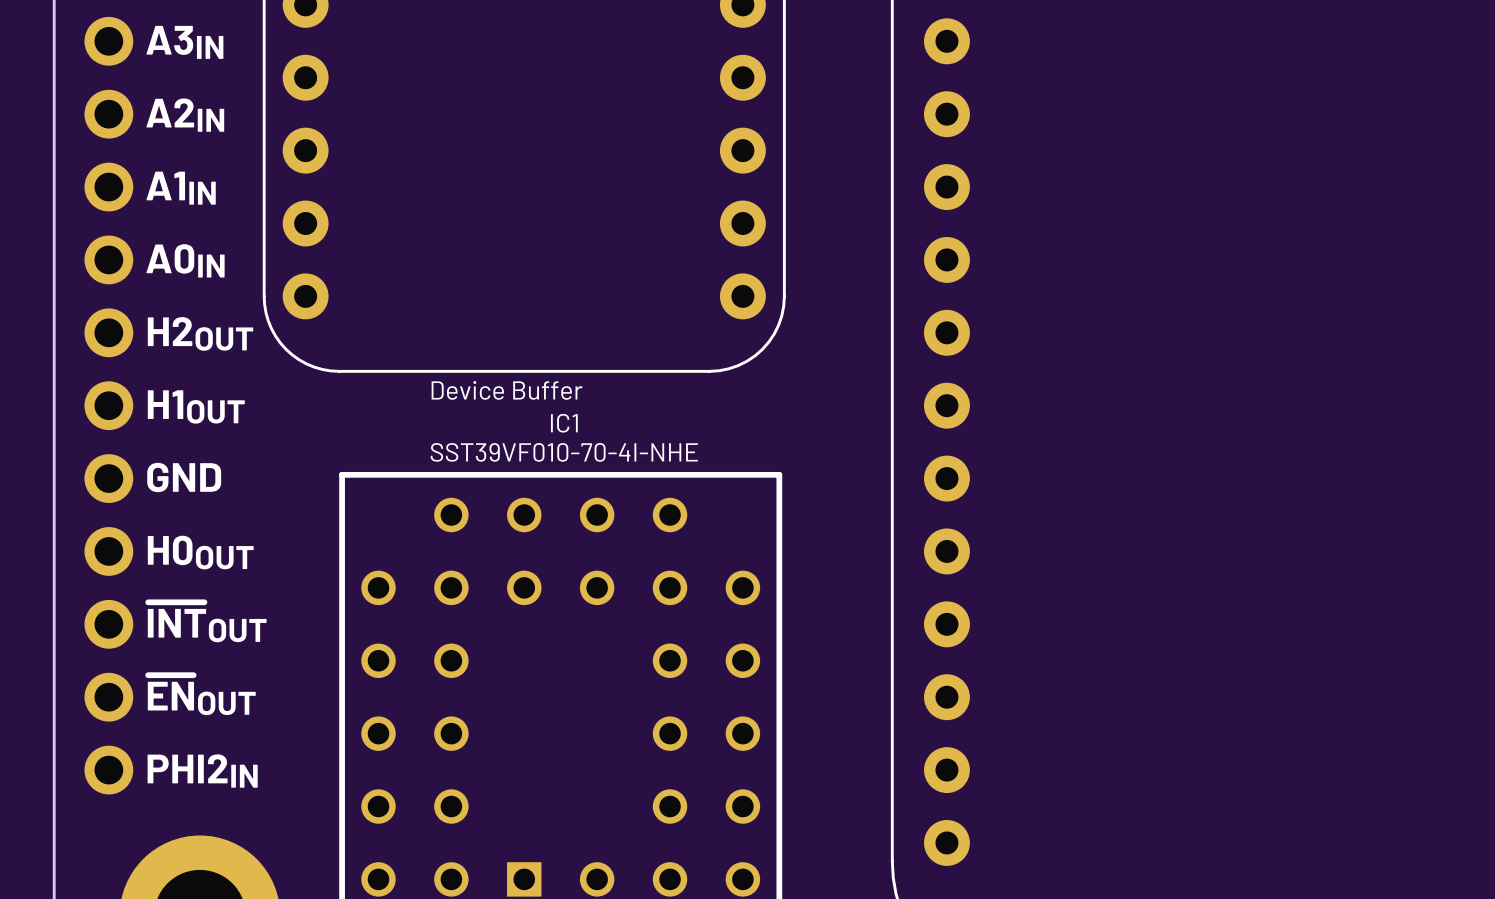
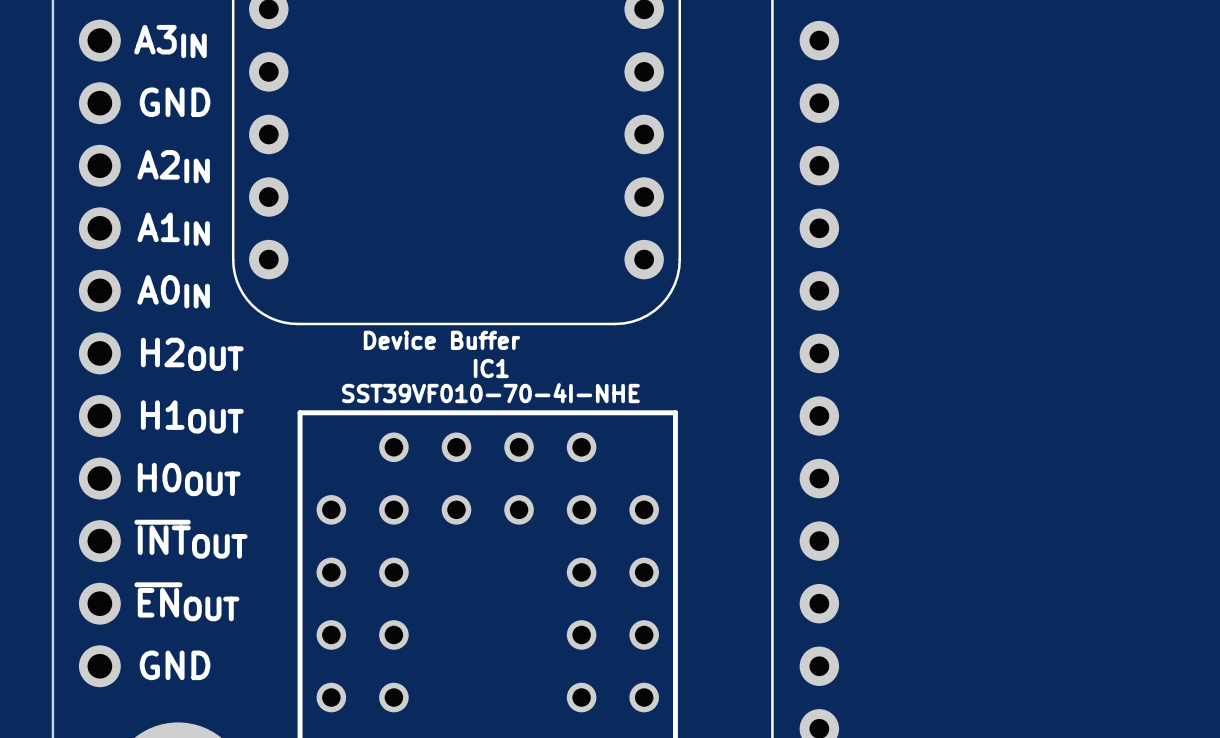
text: none -> GND (175, 102)
text position: A2IN (185, 115) -> A2IN (173, 166)
text position: A1IN (181, 188) -> A1IN (173, 229)
text position: A0IN (185, 260) -> A0IN (173, 291)
text position: H2OUT (200, 333) -> H2OUT (192, 354)
text position: H1OUT (196, 406) -> H1OUT (192, 416)
text: GND (184, 477) -> none
text: PHI2IN (202, 771) -> GND (175, 665)

